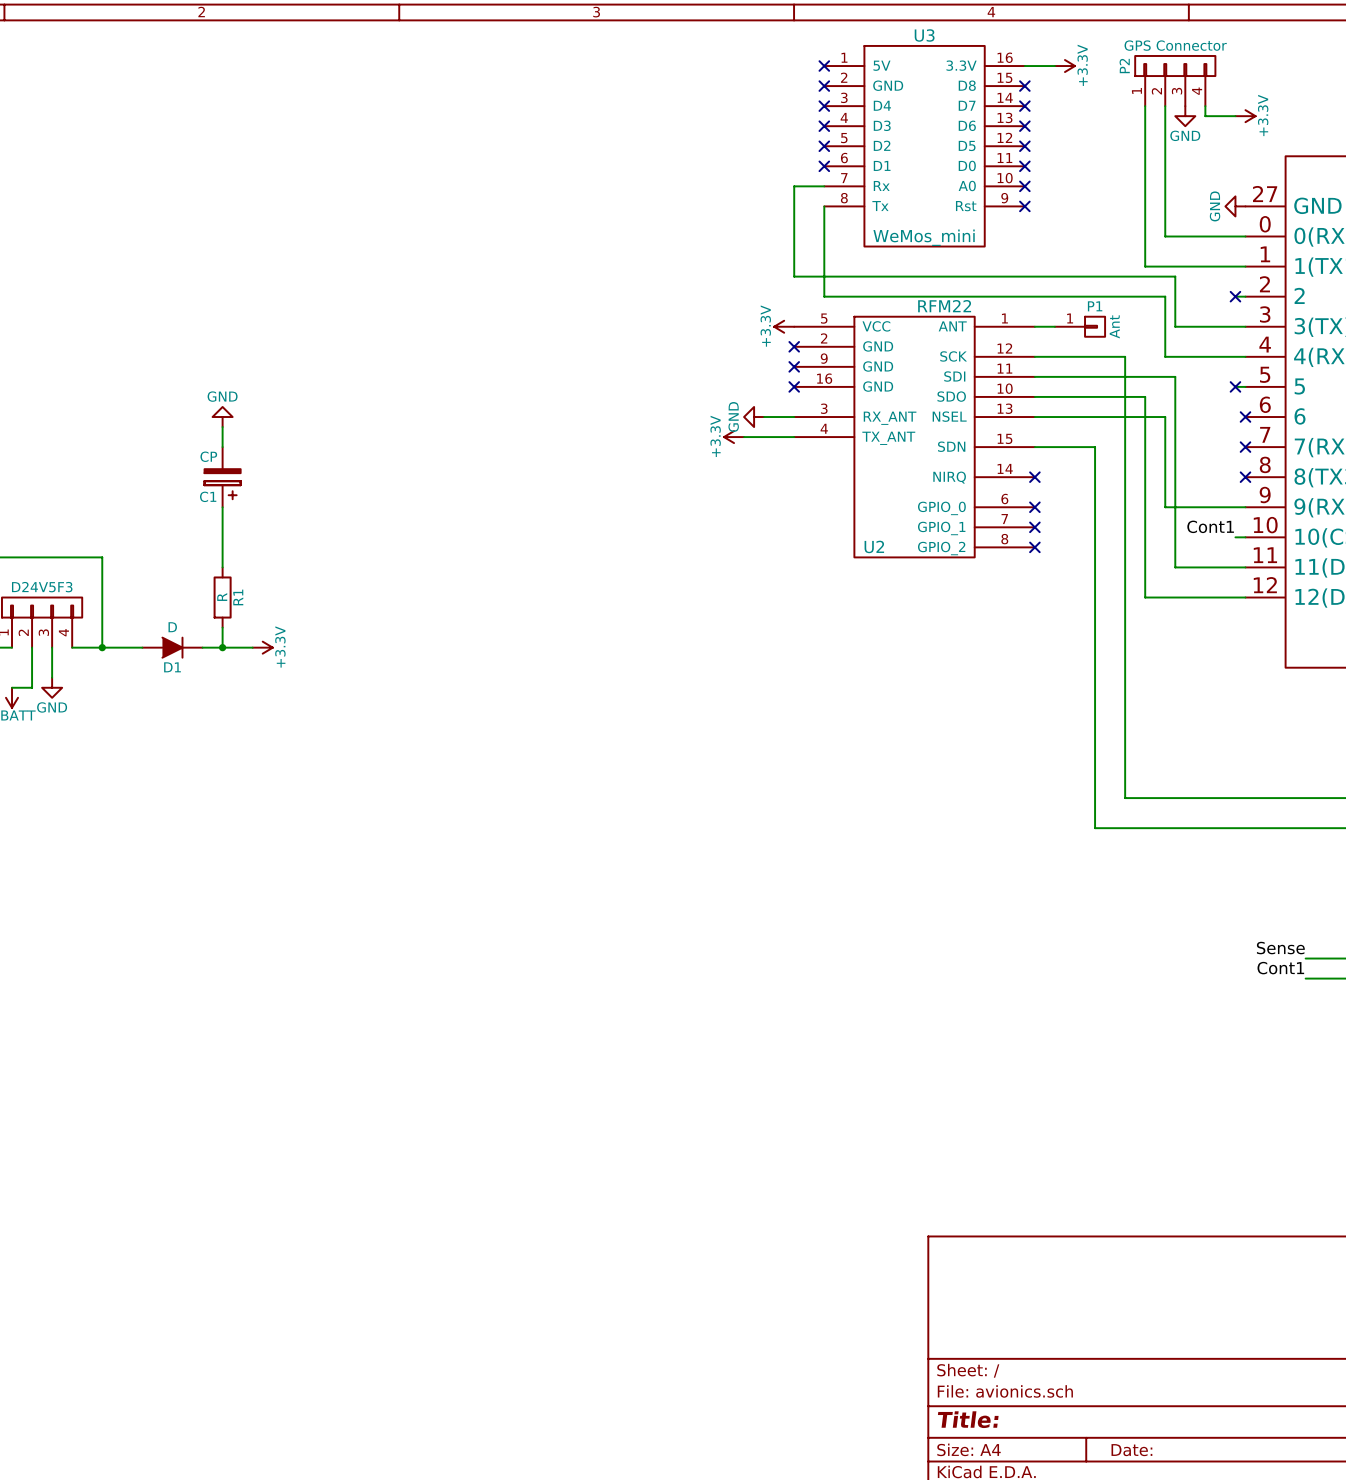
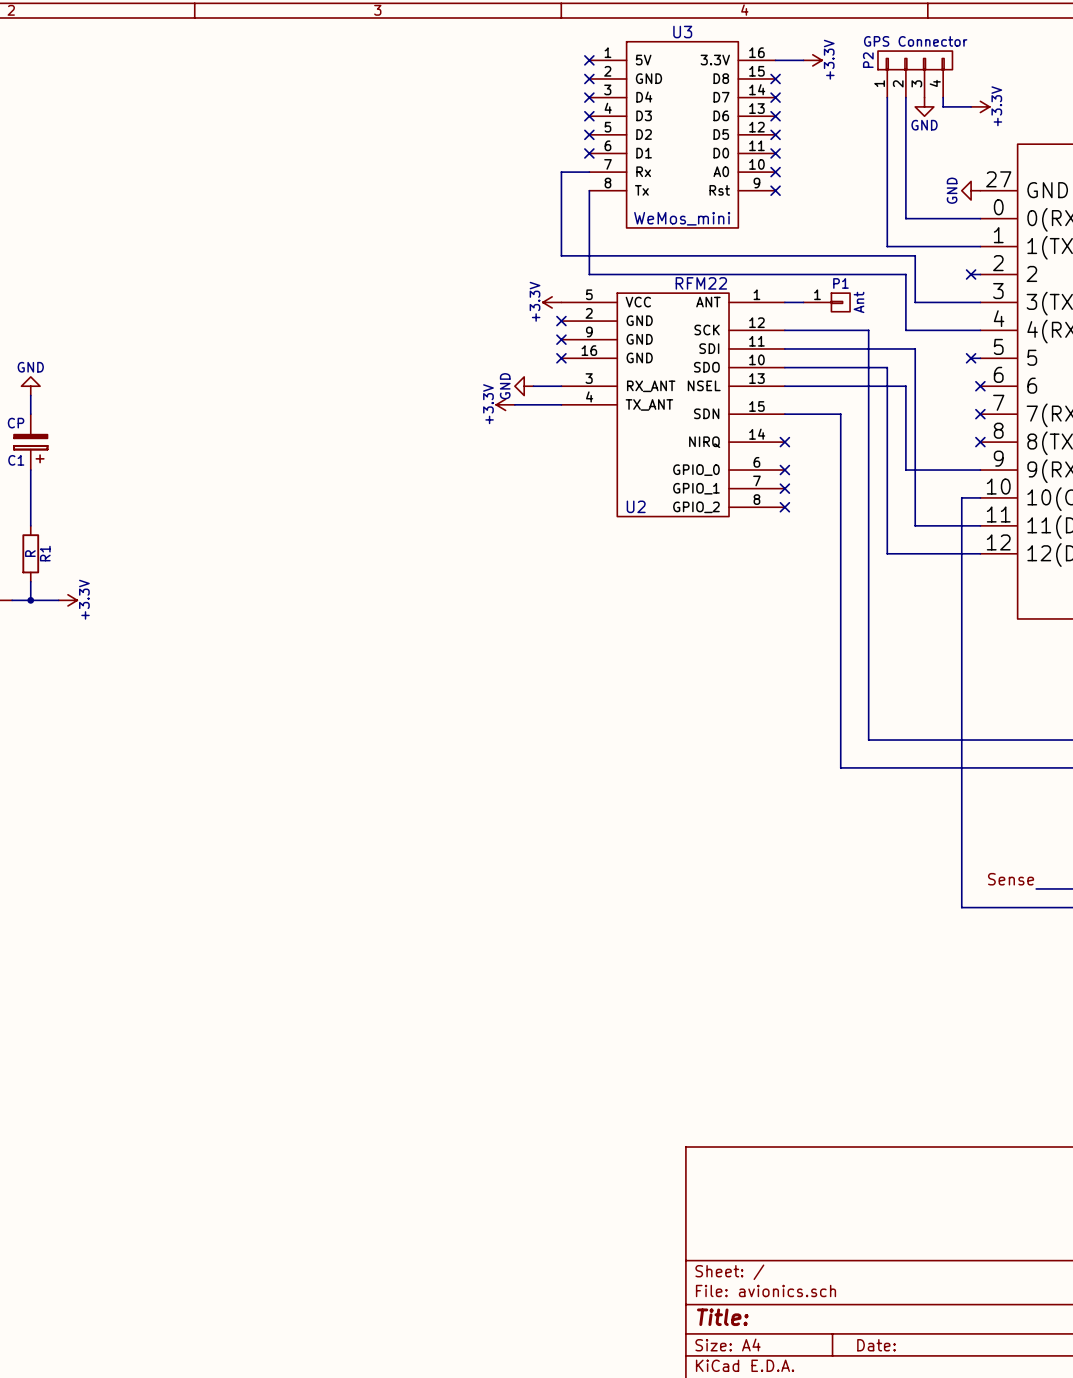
label: Cont1 (1210, 526) -> none
wire: none -> (971, 497) (961, 497) (961, 907) (1036, 907)
label: Cont1 (1280, 968) -> none

